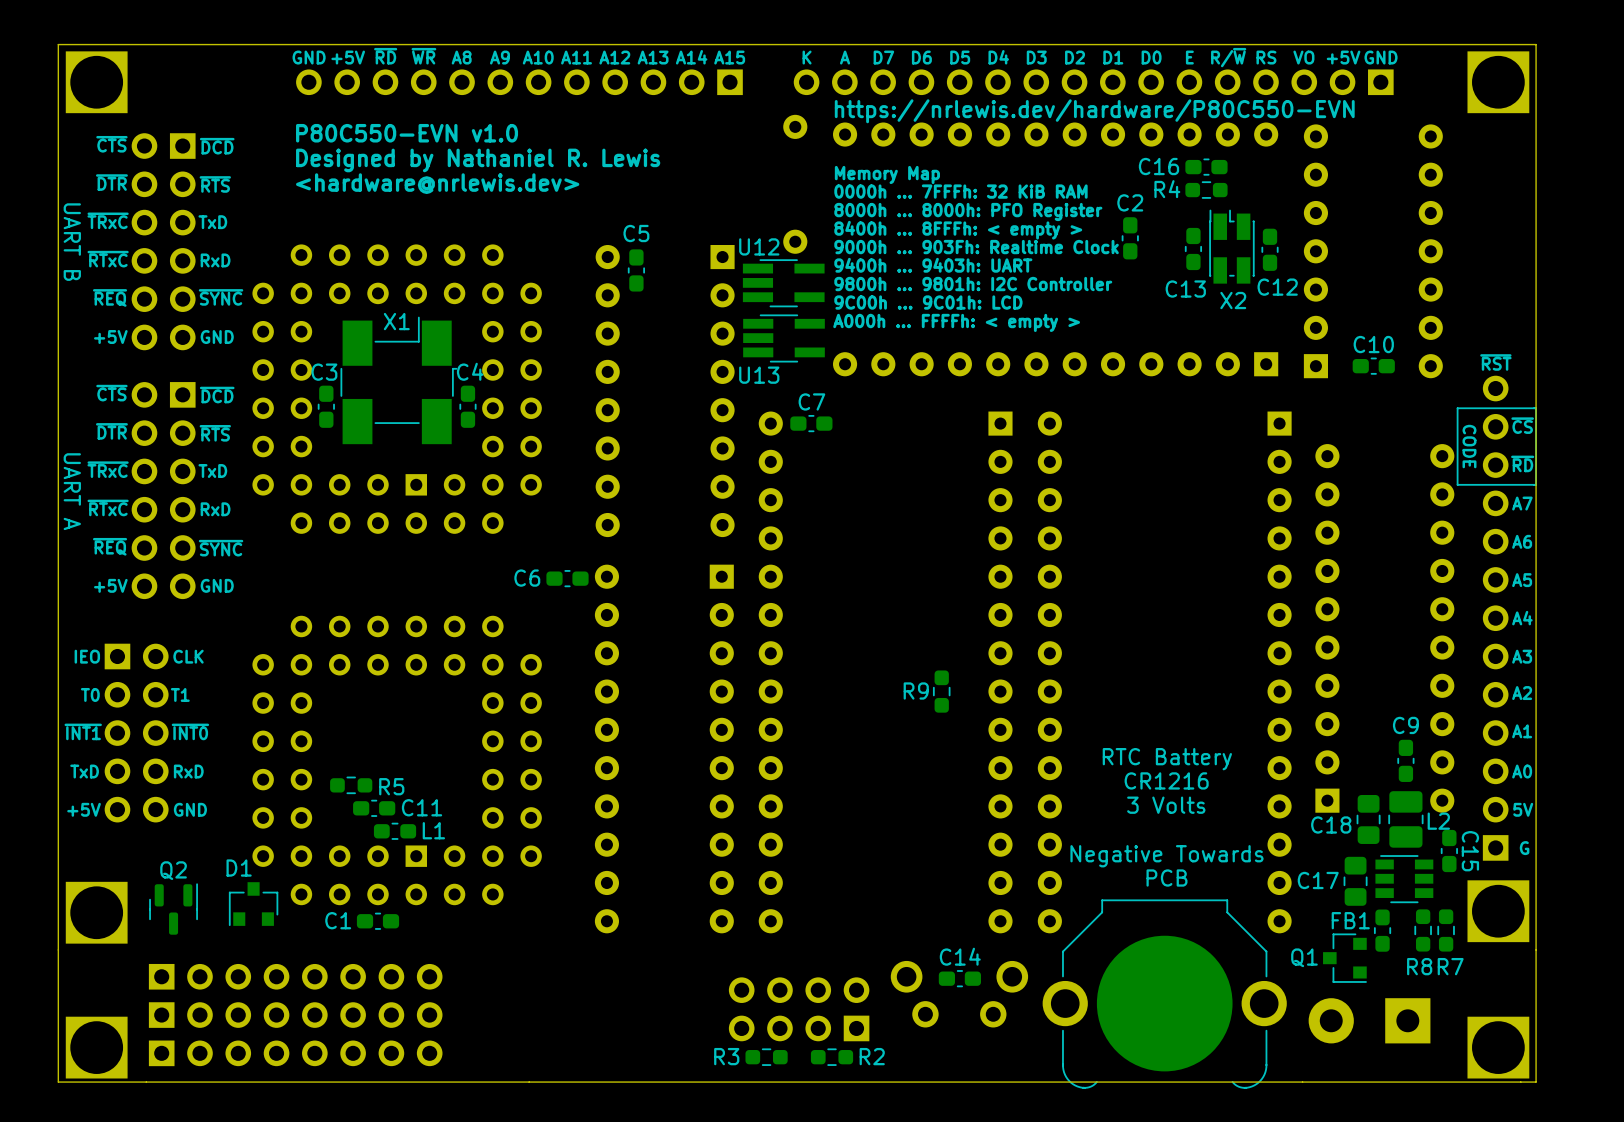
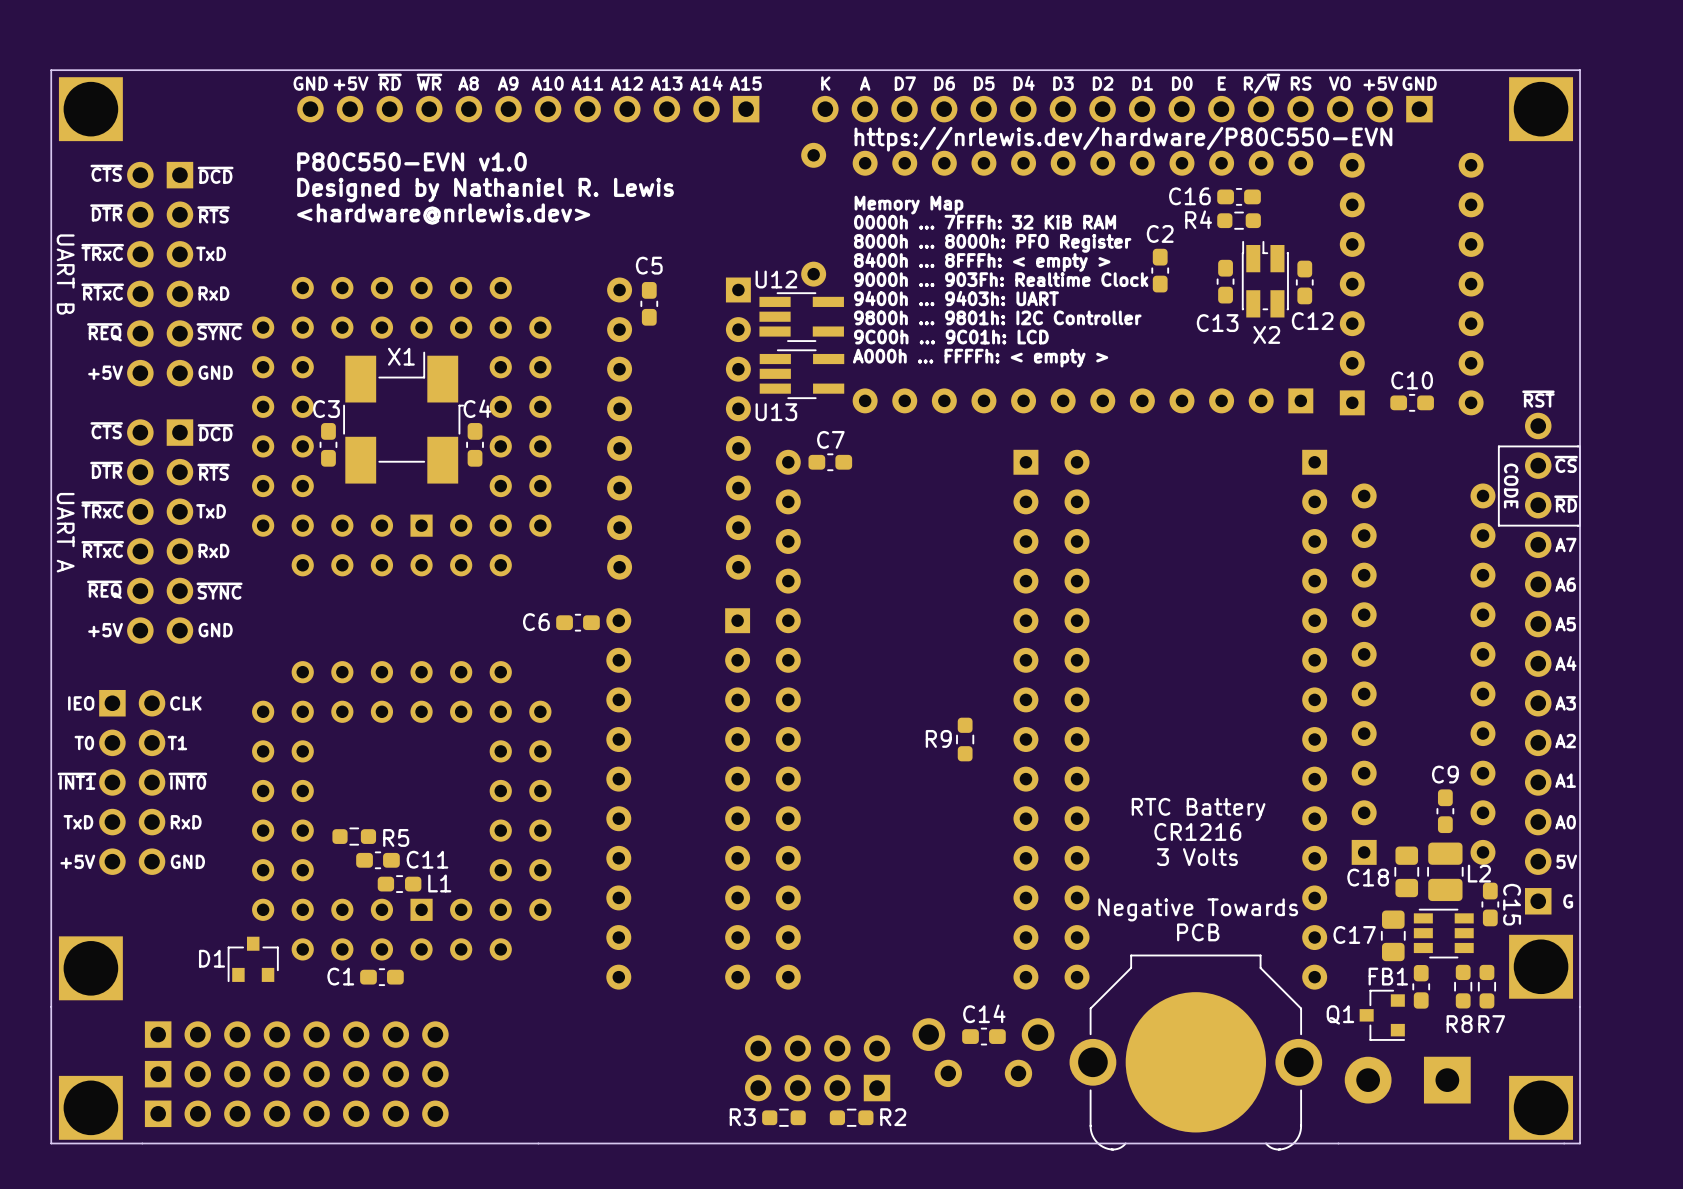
D1 name position: D1 (239, 868) -> D1 (212, 958)
Q2: (173, 909) -> none

